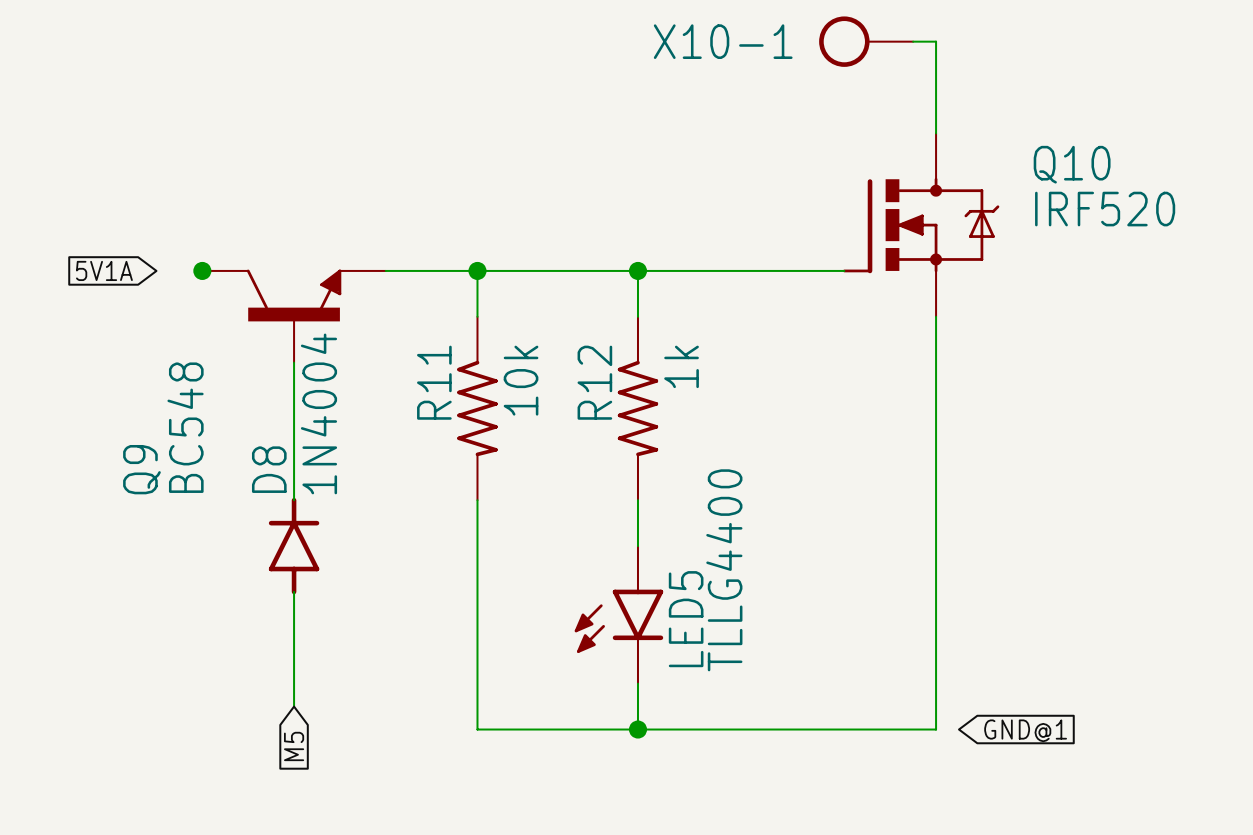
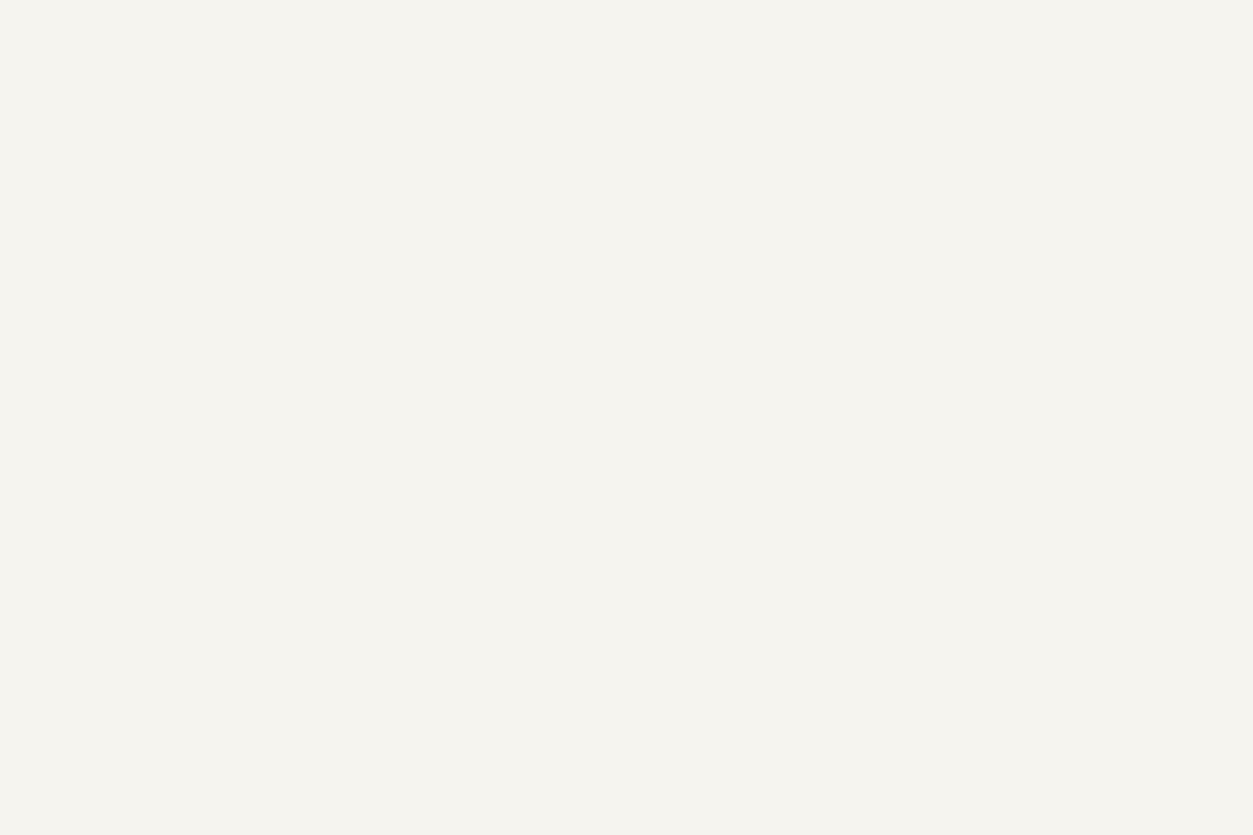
X10-1: (866, 41) -> none
wire: (913, 41) (936, 41) (936, 133) -> none
Q10: IRF520 (921, 225) -> none
global label: 5V1A (104, 270) -> none
junction: (202, 270) -> none
wire: (385, 270) (844, 270) -> none
wire: (477, 270) (477, 316) -> none
junction: (477, 270) -> none
wire: (637, 270) (637, 316) -> none
junction: (637, 270) -> none
Q9: BC548 (294, 316) -> none
wire: (936, 316) (936, 729) (477, 729) (477, 500) -> none
wire: (294, 362) (294, 500) -> none
R11: 10k (477, 408) -> none
R12: 1k (637, 408) -> none
wire: (637, 500) (637, 546) -> none
D8: 1N4004 (294, 546) -> none
wire: (294, 591) (294, 706) -> none
LED5: TLLG4400 (618, 614) -> none
wire: (637, 683) (637, 729) -> none
junction: (637, 729) -> none
global label: GND@1 (1025, 730) -> none
global label: M5 (294, 746) -> none

